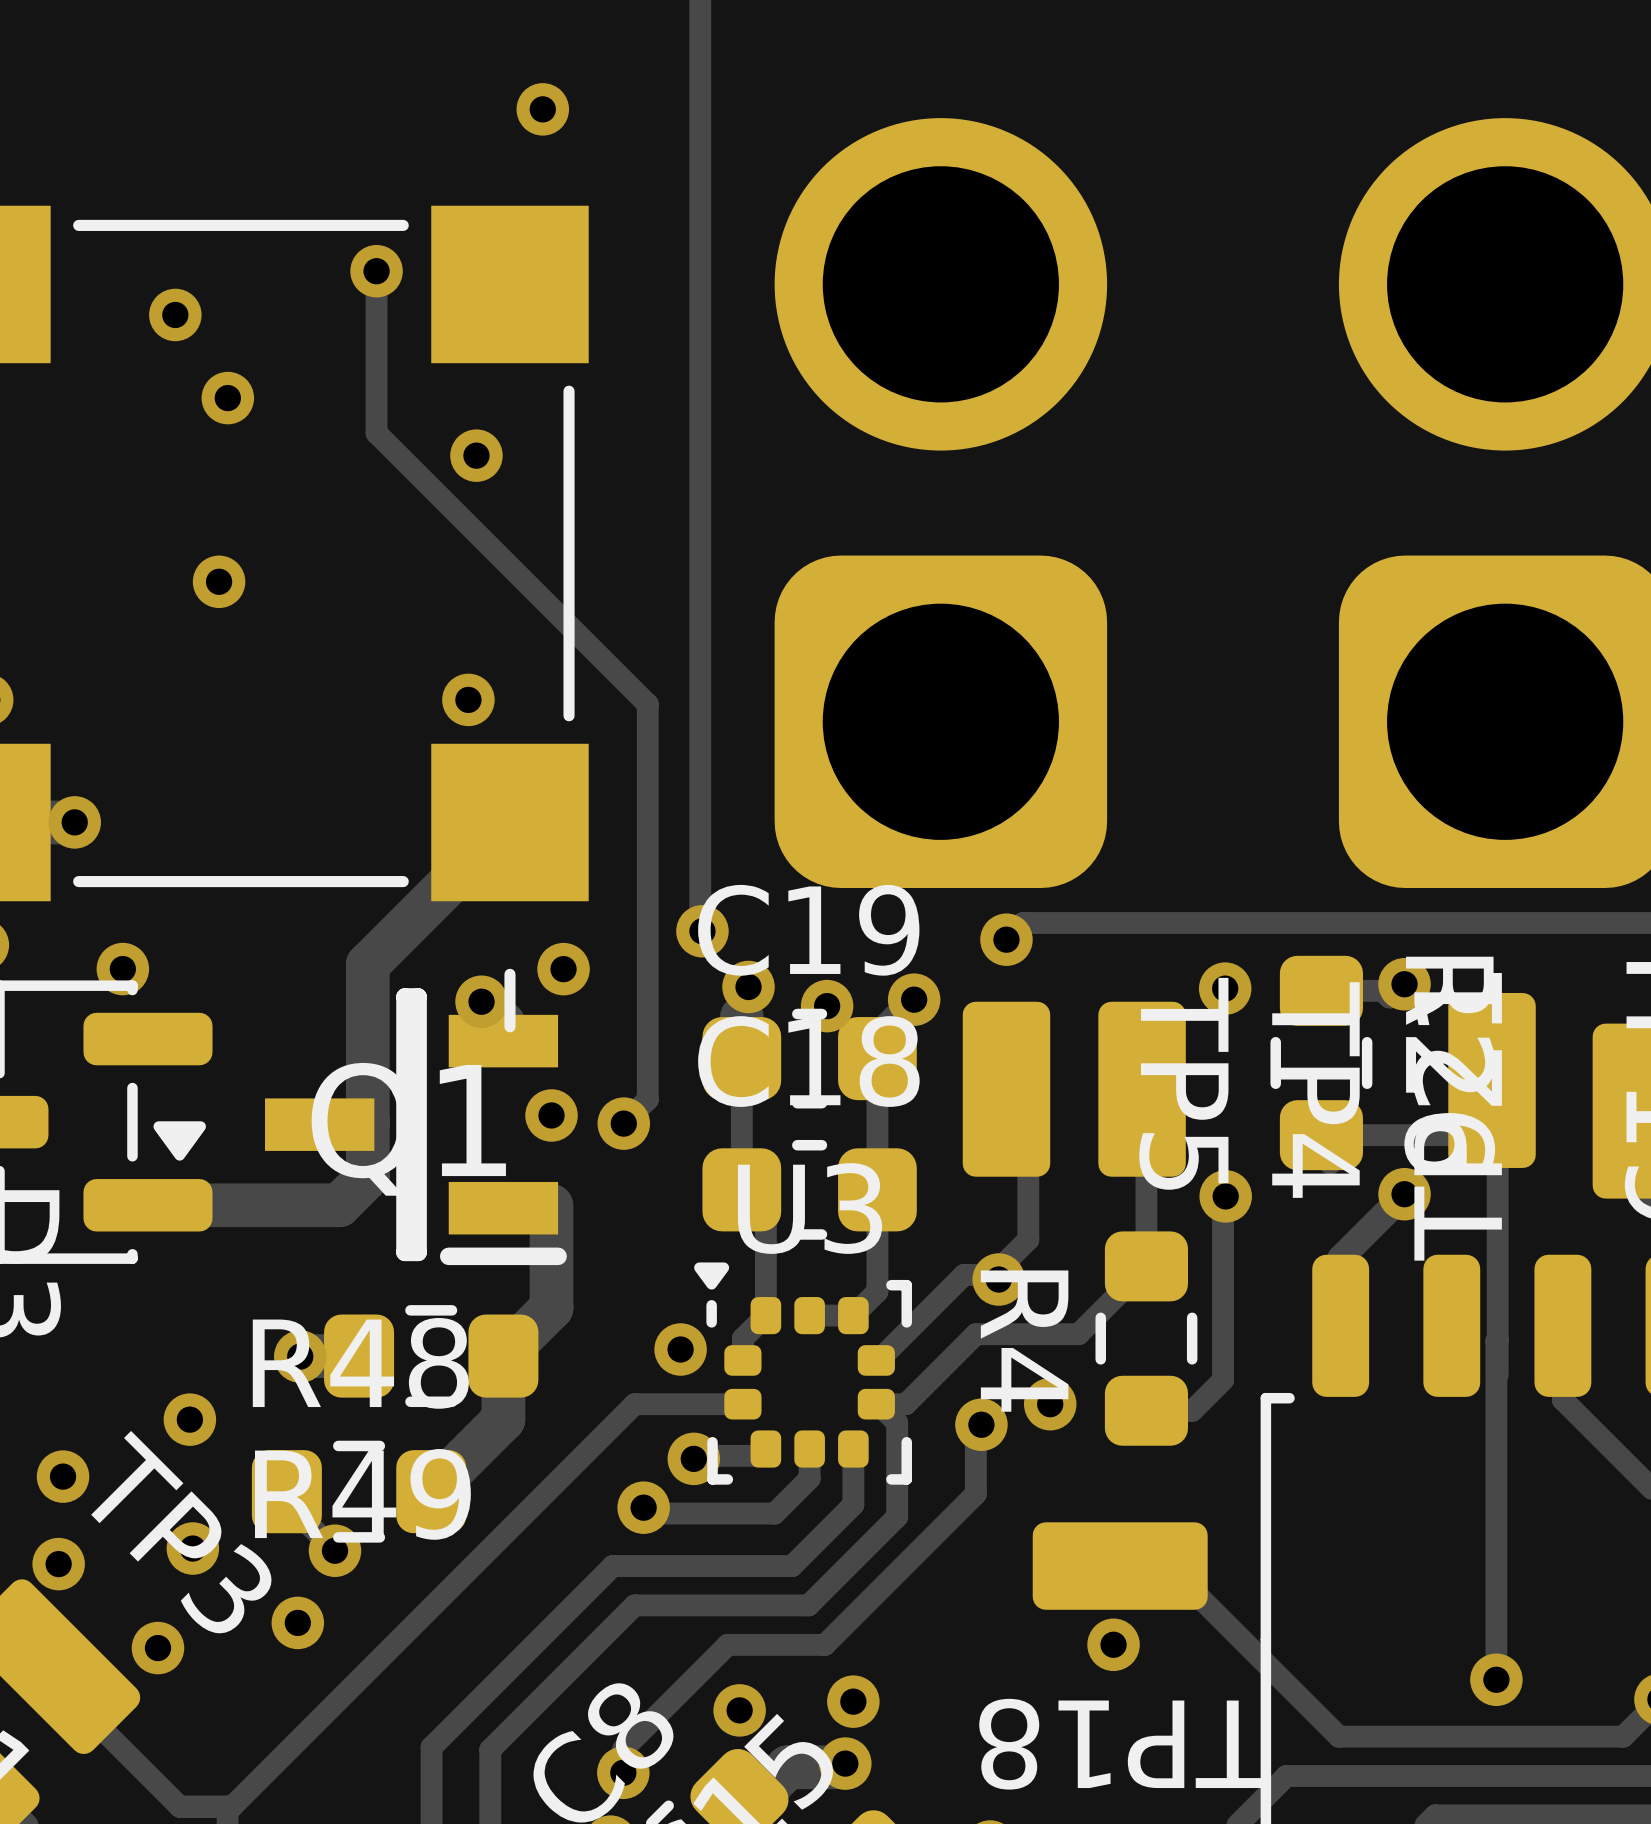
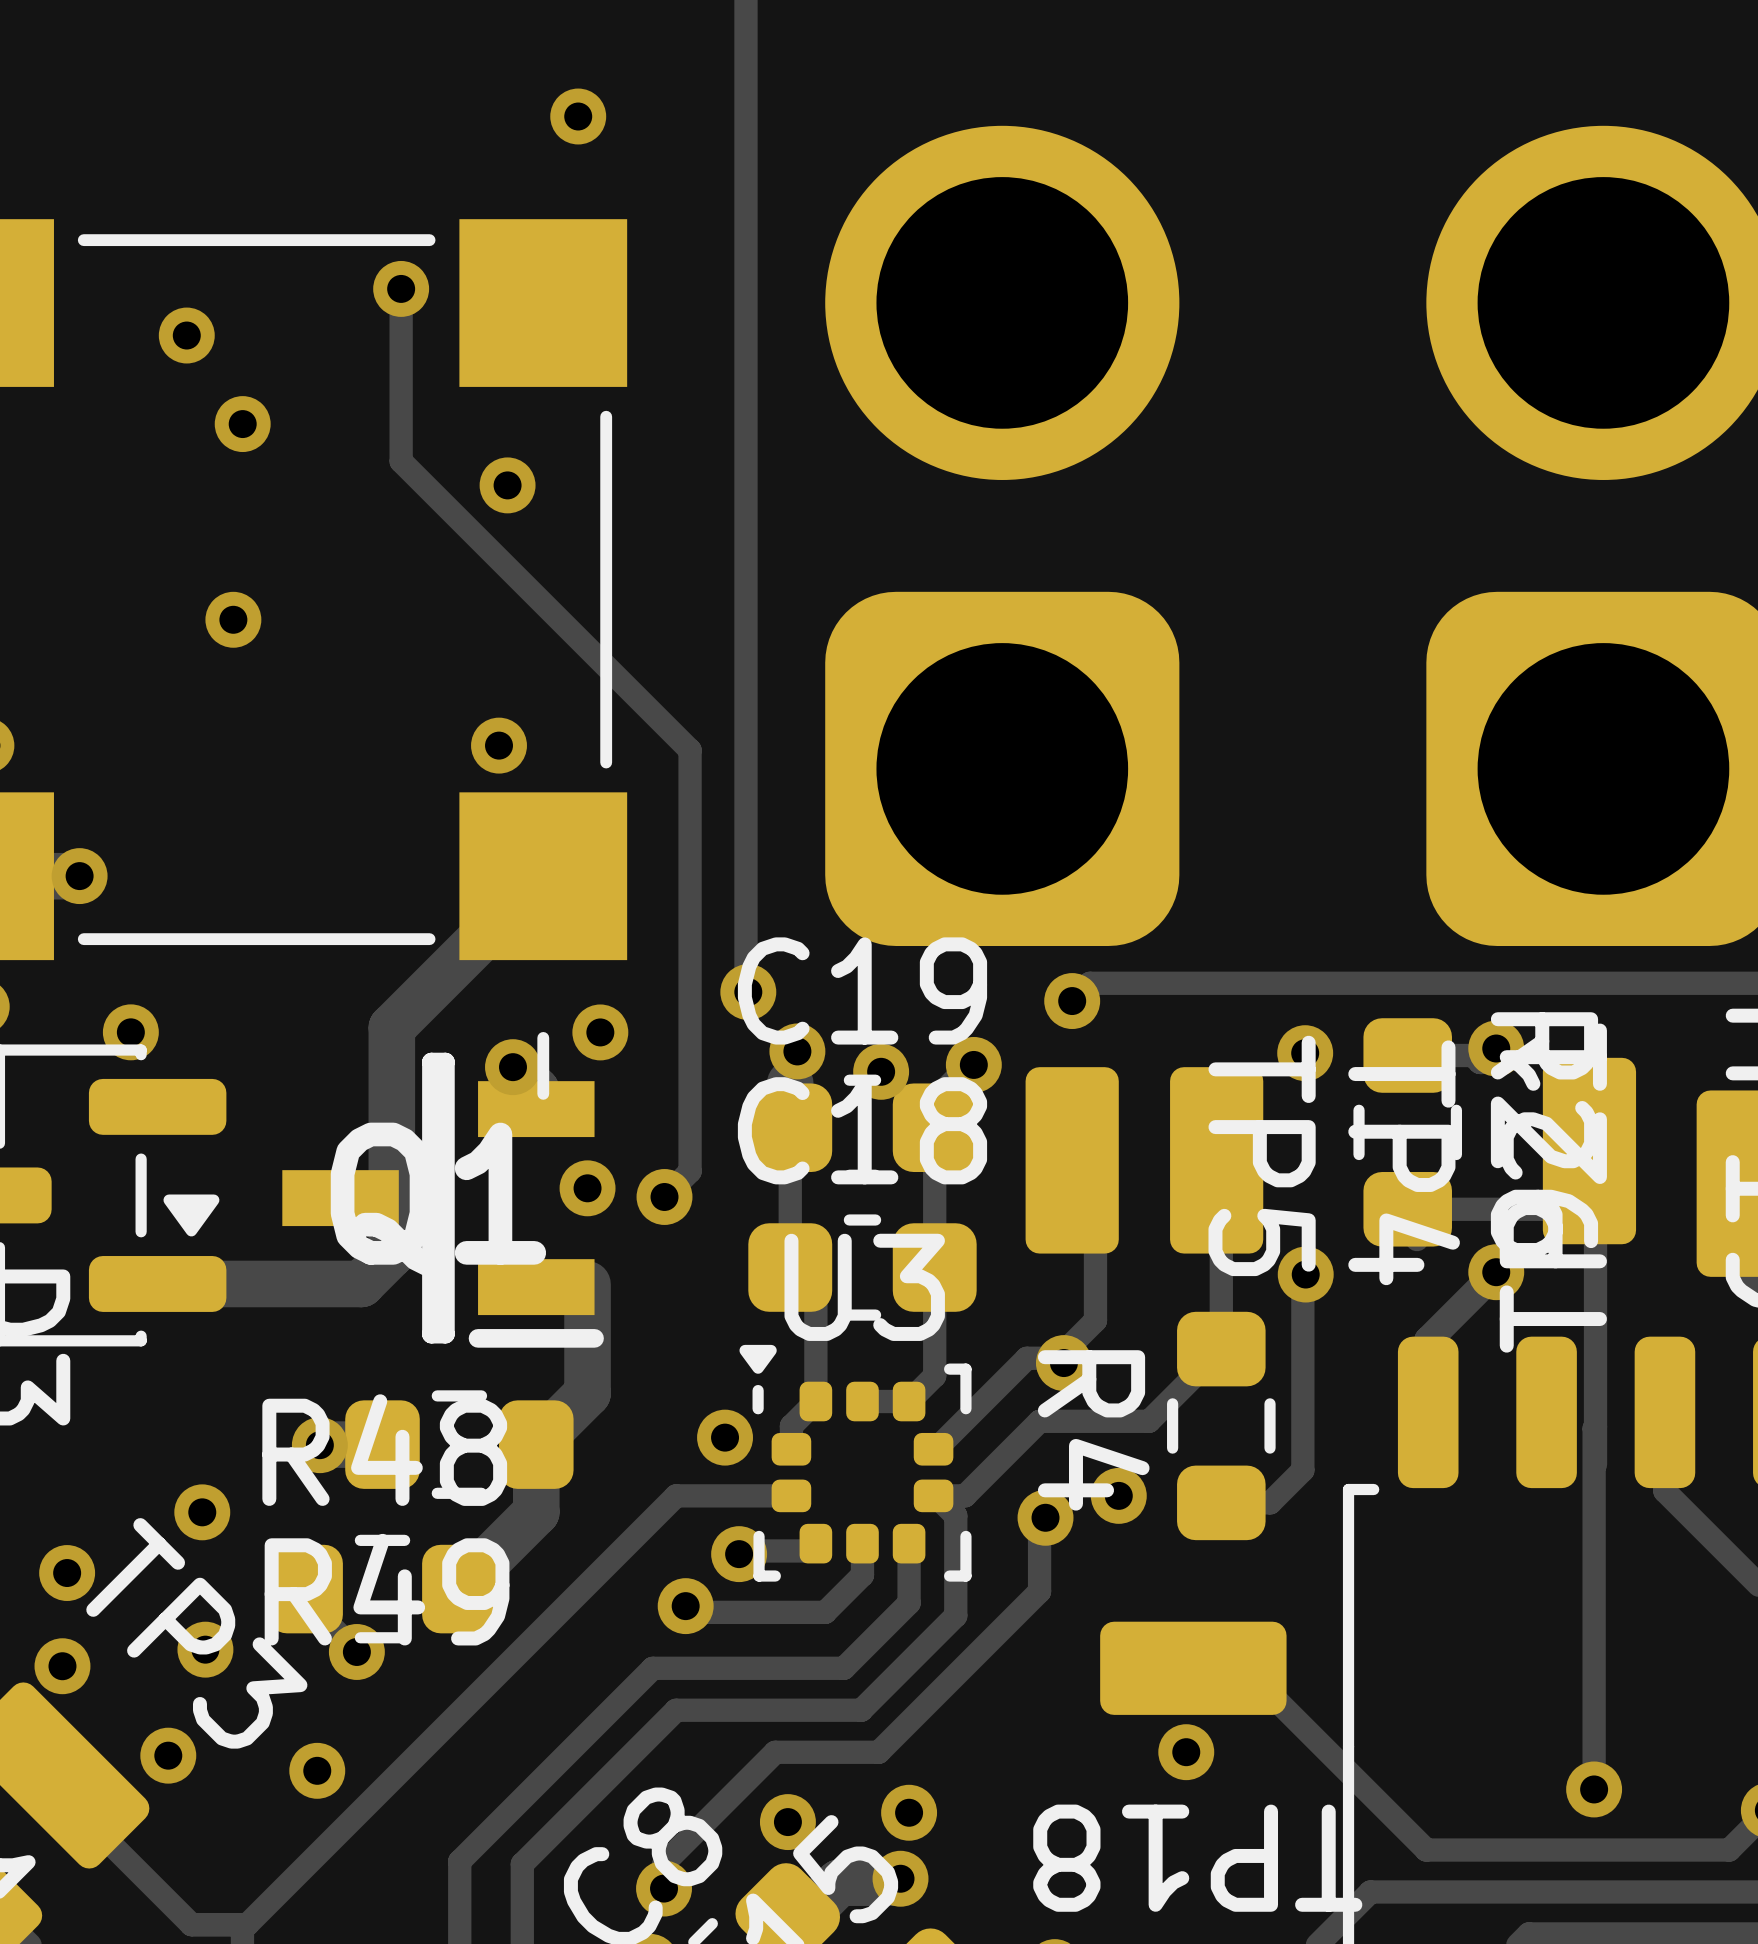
via position: (297, 1622) -> (317, 1770)

